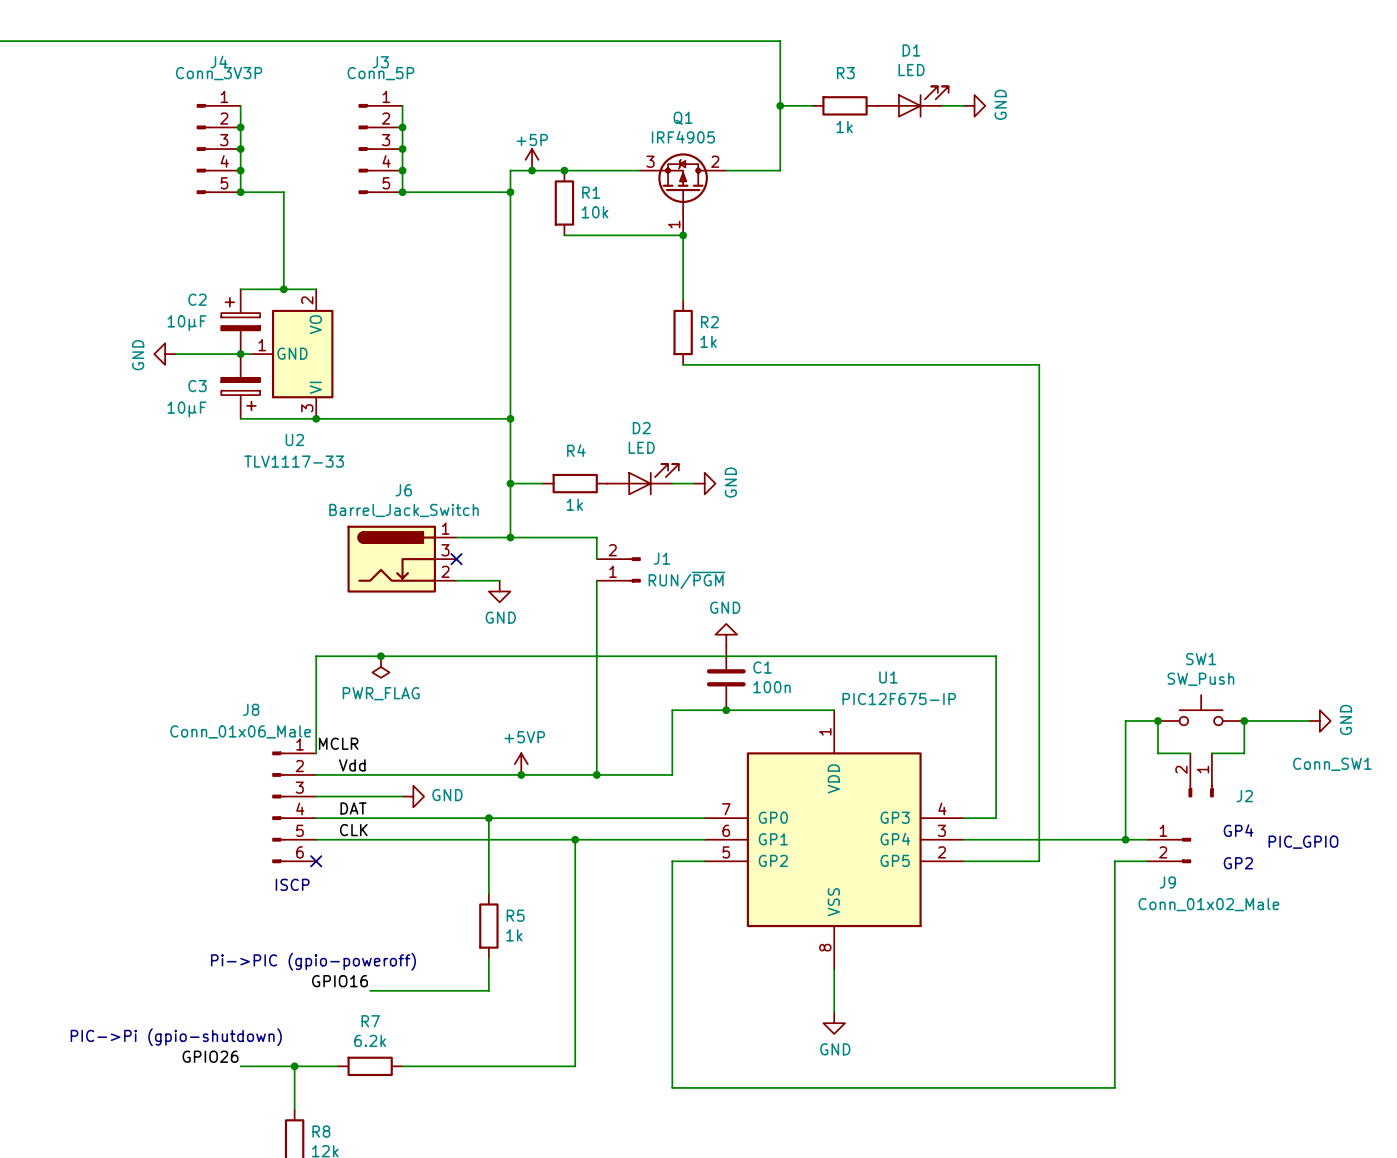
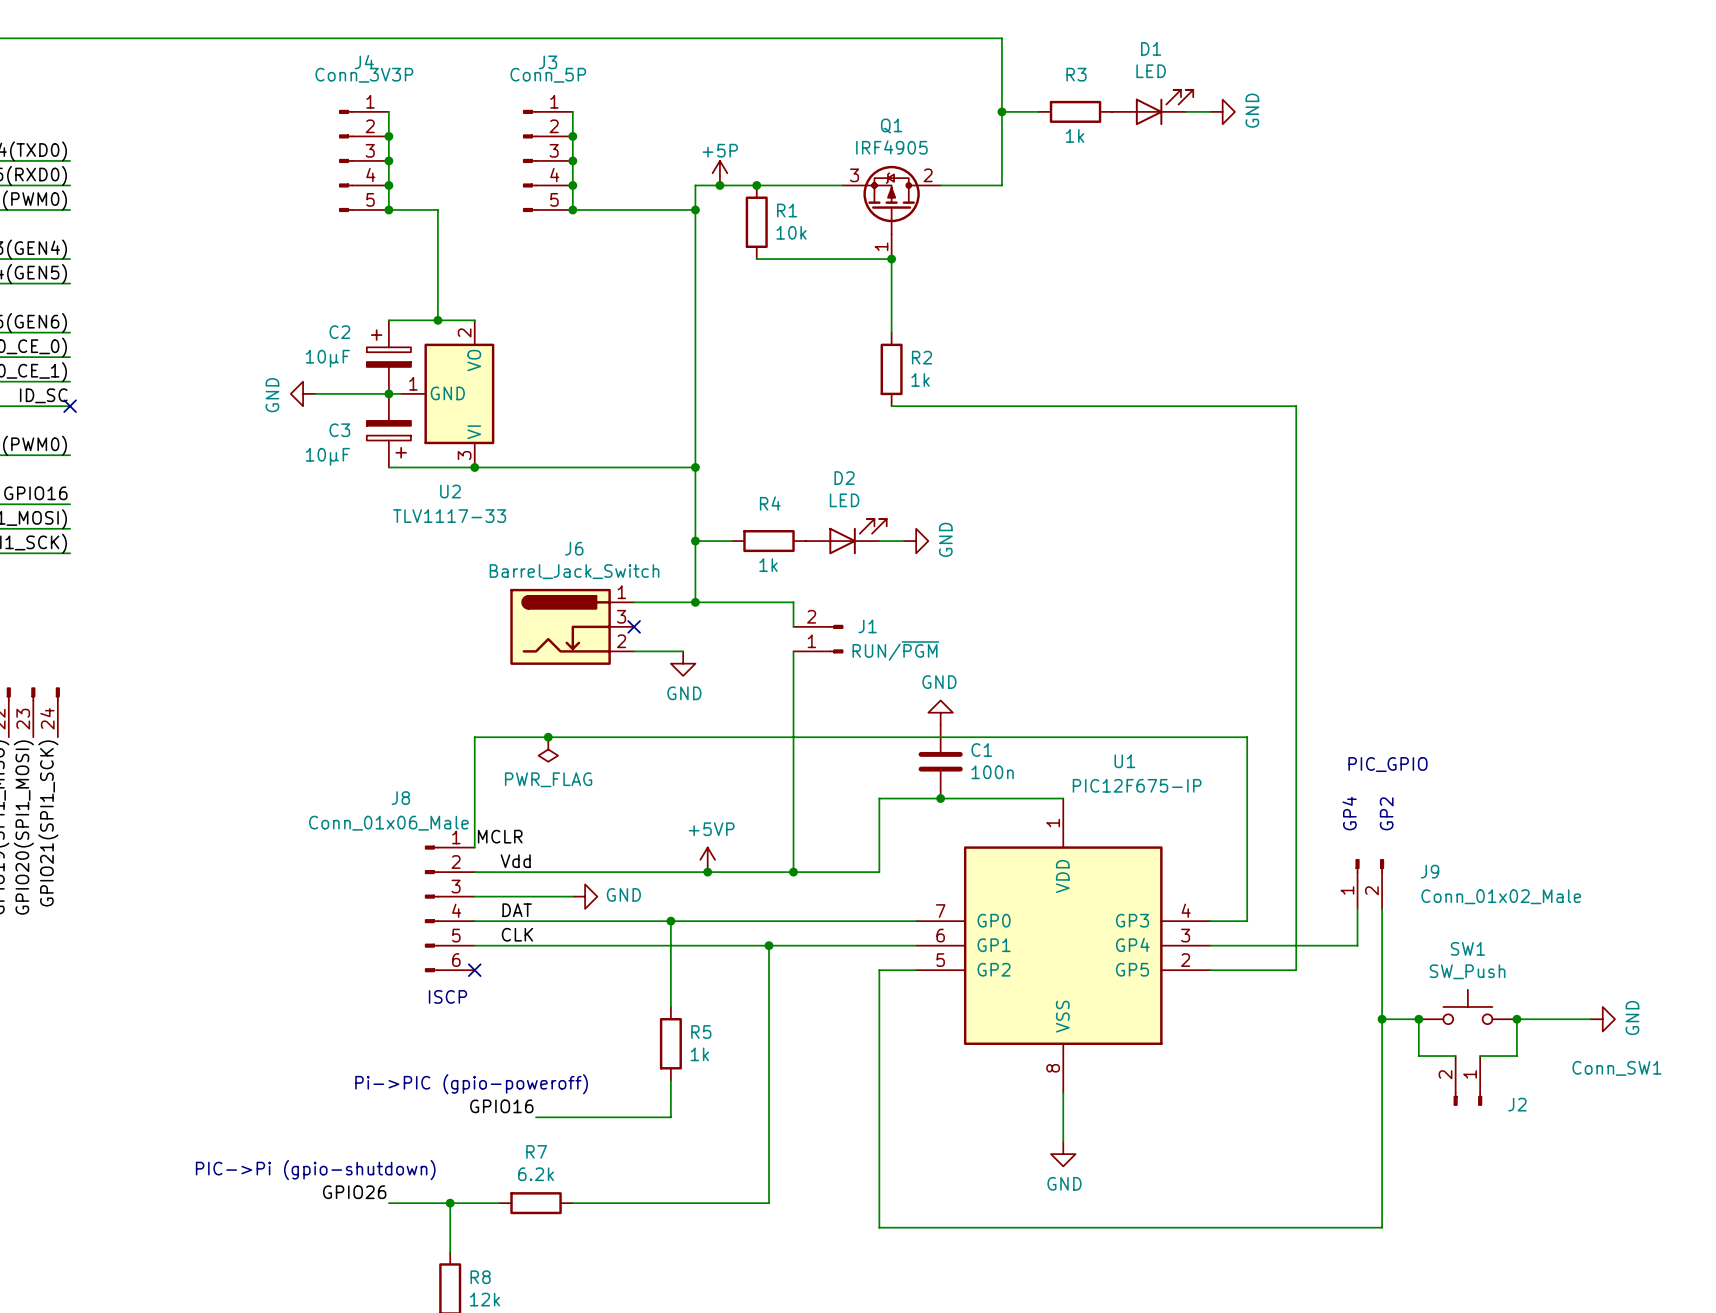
text: none -> PIC_GPIO (1387, 764)
SW1 position: (1201, 710) -> (1467, 1006)
junction: (1157, 721) -> none
junction: (1244, 721) -> none
wire: (1309, 721) (1244, 721) (1244, 753) (1211, 753) -> (1590, 1019) (1516, 1019) (1516, 1056) (1480, 1056)
power symbol position: GND (1319, 721) -> GND (1602, 1019)
wire: (1190, 753) (1157, 753) (1157, 721) (1125, 721) (1125, 839) -> none
J2 position: (1201, 775) -> (1467, 1080)
text rotation: 0° (1238, 830) -> 90° counterclockwise (1349, 813)
text position: GP4 (1238, 830) -> GP4 (1349, 813)
wire: (1093, 839) (1147, 839) -> (1357, 945) (1357, 908)
junction: (1125, 839) -> none
text: PIC_GPIO (1303, 842) -> none
J9 position: (1169, 850) -> (1369, 884)
J9 rotation: 0° (1184, 850) -> 90° counterclockwise (1369, 865)
wire: (1114, 861) (1147, 861) -> (1382, 970) (1382, 908)
text rotation: 0° (1238, 863) -> 90° counterclockwise (1386, 813)
text position: GP2 (1238, 863) -> GP2 (1386, 813)
J9 name position: J9 (1167, 882) -> J9 (1430, 871)
wire: none -> (1382, 1019) (1418, 1019) (1418, 1056) (1455, 1056)
junction: none -> (1382, 1019)
junction: none -> (1418, 1019)
J9 value position: Conn_01x02_Male (1208, 904) -> Conn_01x02_Male (1501, 896)
junction: none -> (1516, 1019)

